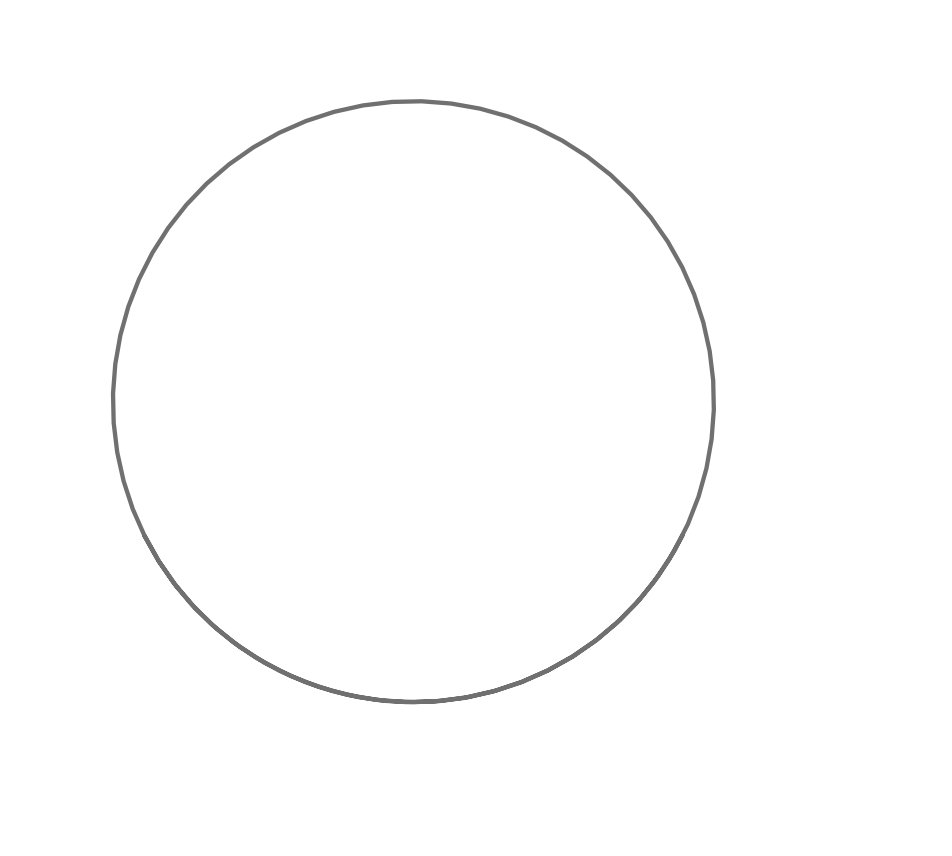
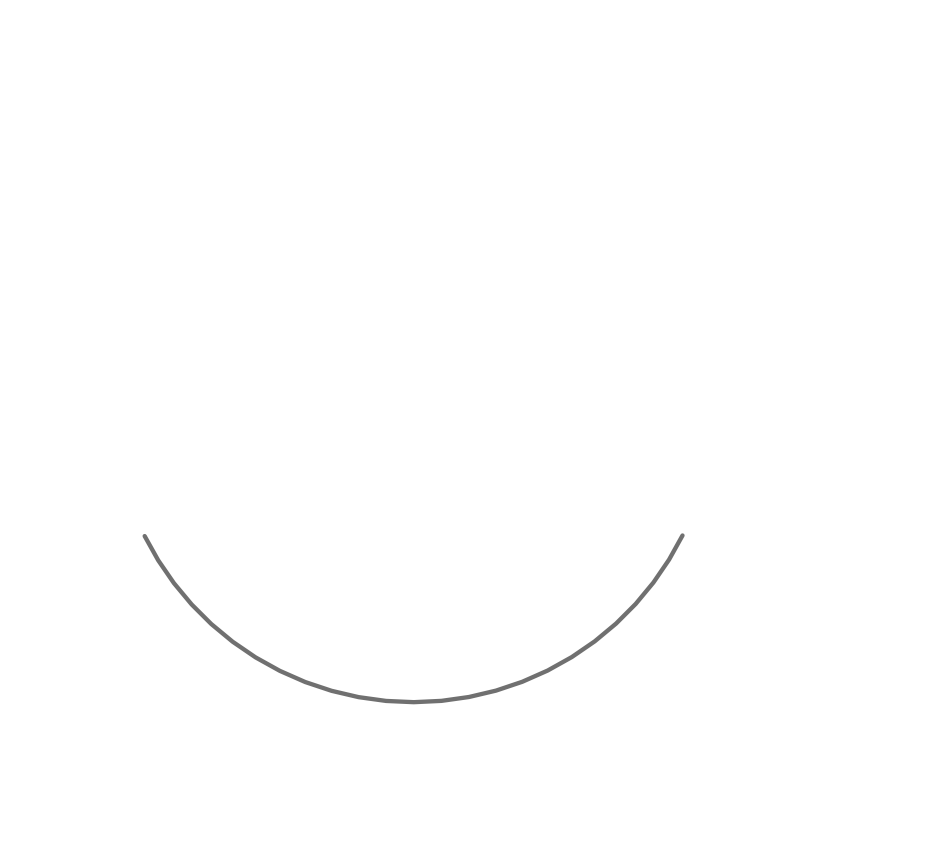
line: (144, 536) (123, 481) (113, 422) (115, 364) (128, 306) (152, 252) (186, 204) (229, 164) (279, 132) (334, 111) (392, 101) (451, 103) (508, 116) (562, 140) (610, 174) (650, 217) (682, 267) (703, 322) (713, 380) (711, 439) (698, 496) (674, 550) (640, 598) (597, 639) (547, 670) (492, 691) (434, 701) (375, 699) (318, 686) (264, 662) (216, 628) (176, 585) (144, 536) -> none

